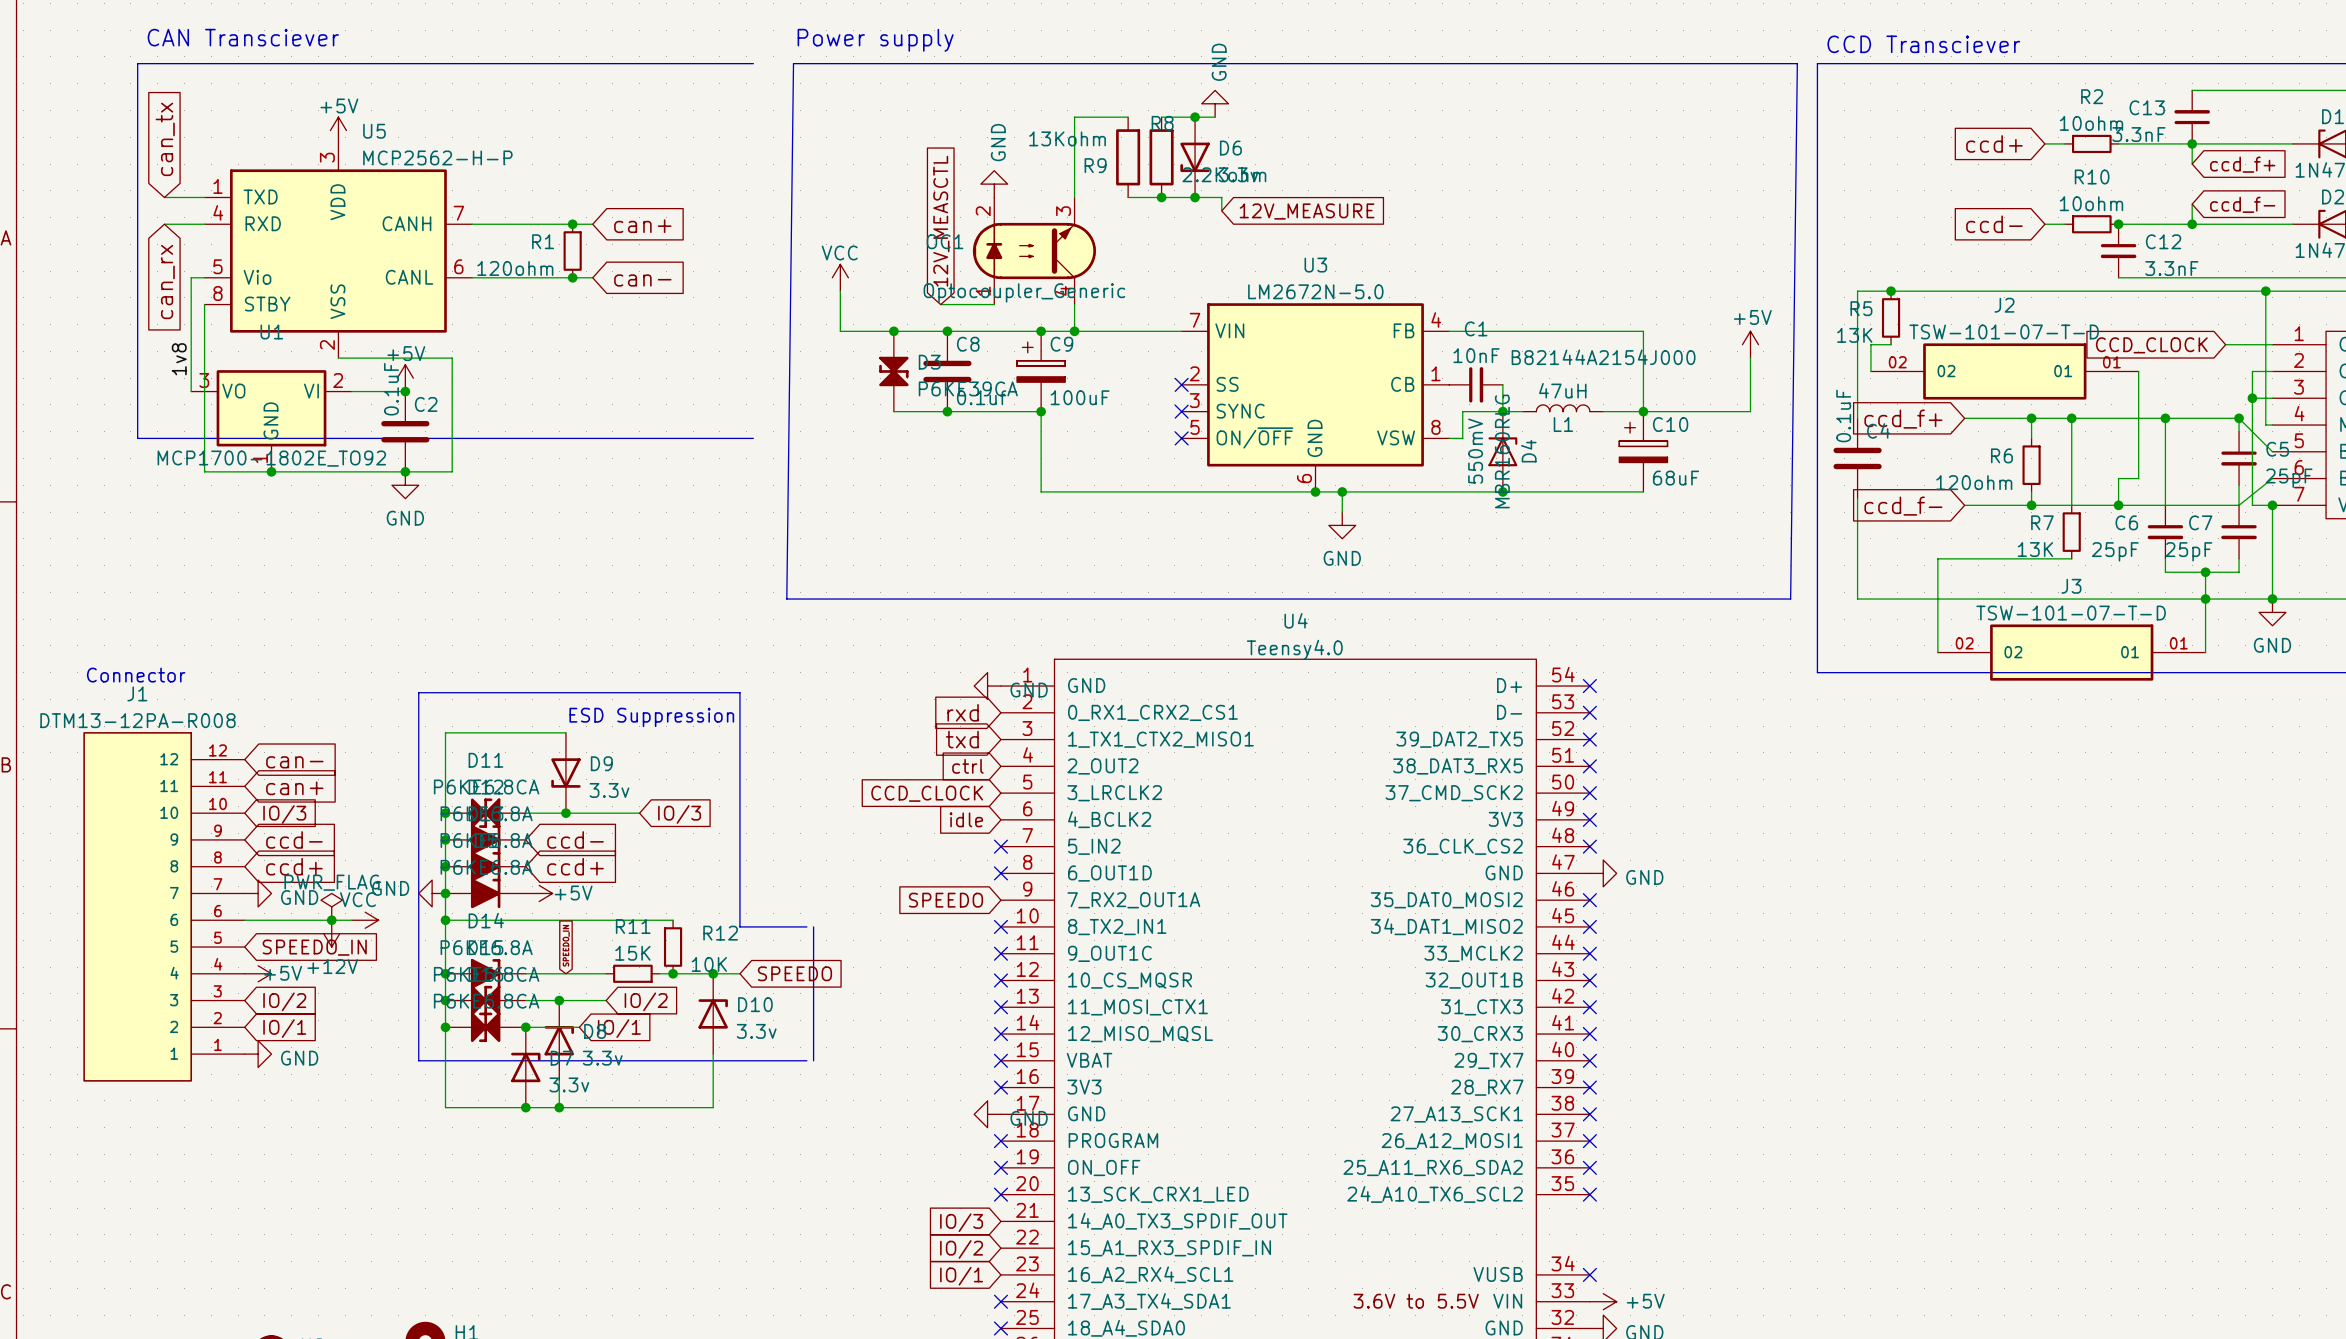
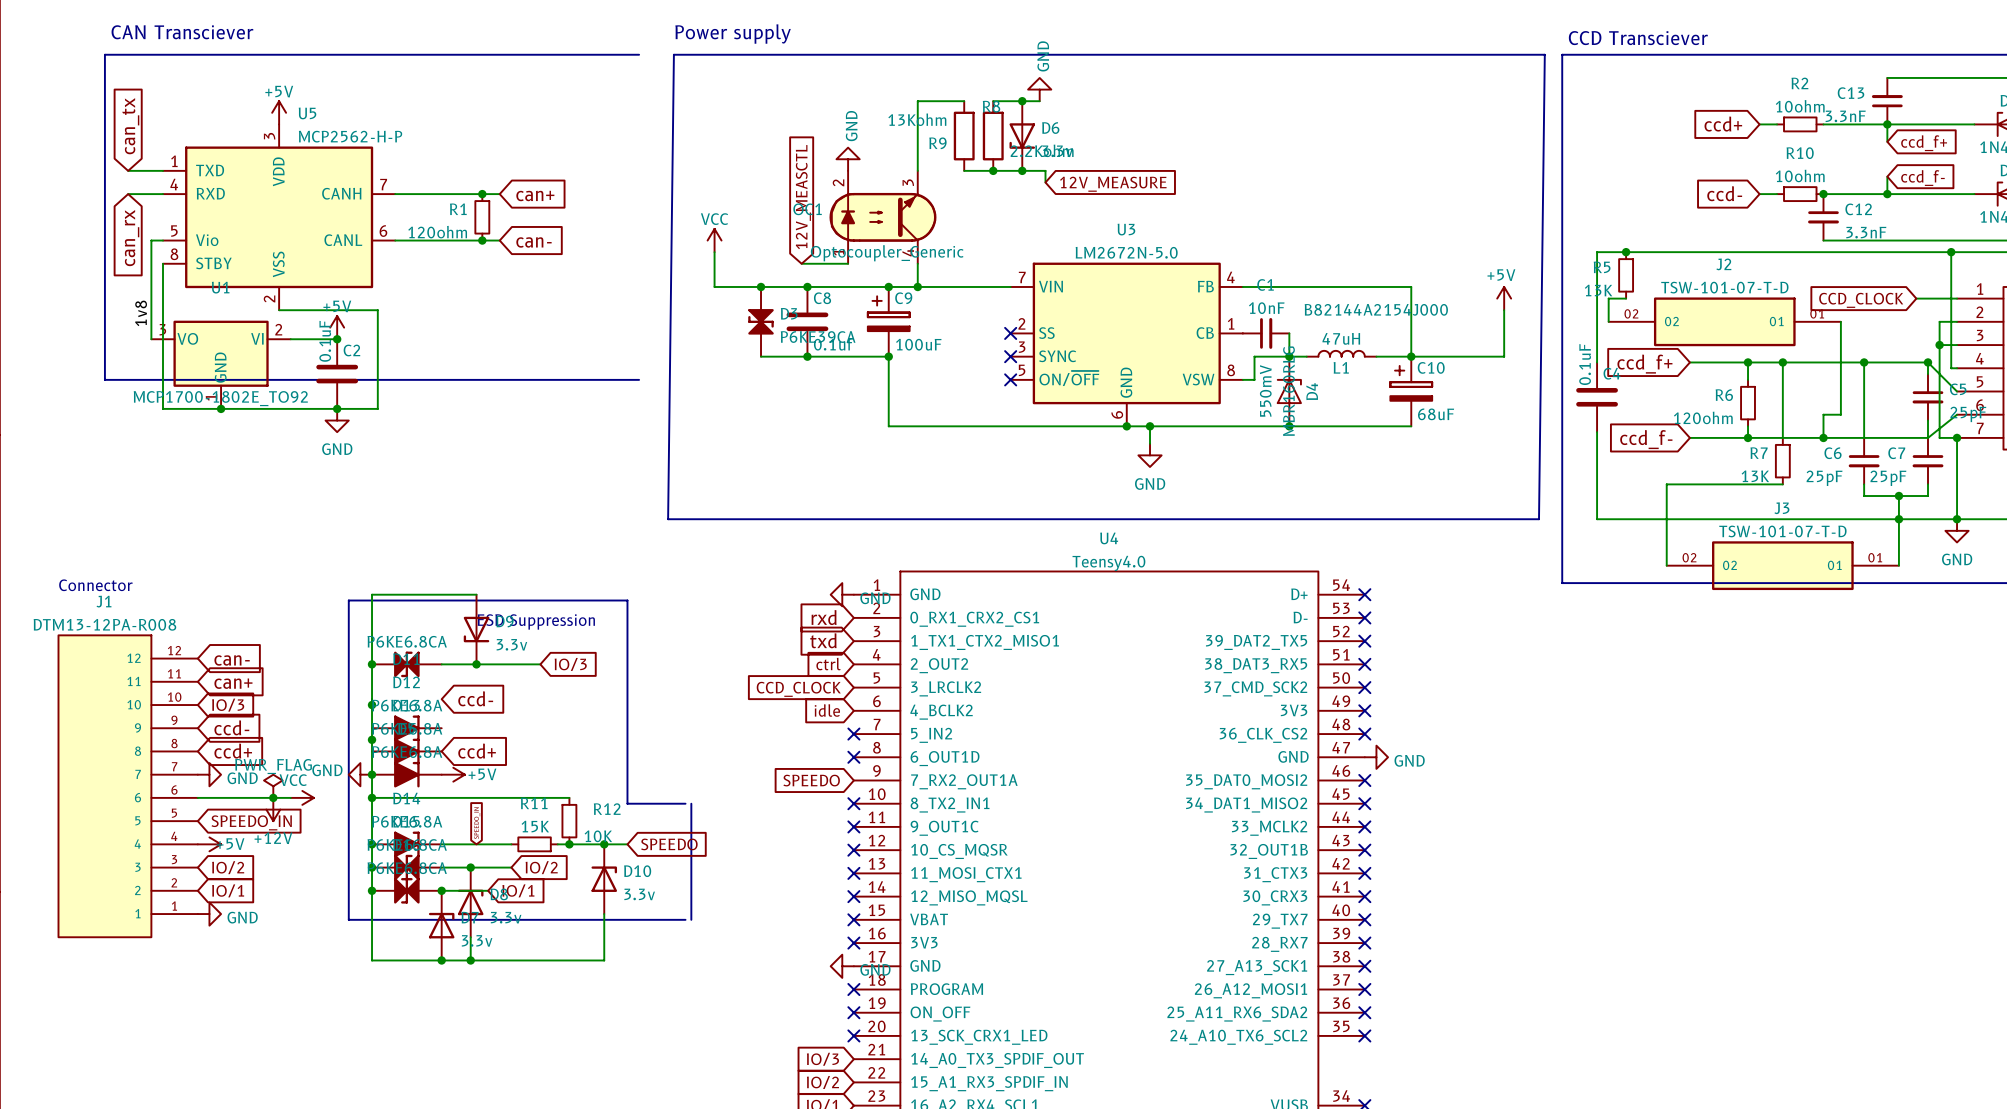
wire: (445, 732) (565, 732) -> (372, 635) (372, 594) (476, 594)
junction: none -> (372, 664)
D9 position: (565, 773) -> (476, 629)
D11 position: (485, 813) -> (406, 664)
wire: (525, 813) (639, 813) -> (441, 664) (540, 664)
junction position: (565, 813) -> (476, 664)
global label position: IO/3 (679, 814) -> IO/3 (570, 664)
junction: (445, 839) -> none
global label position: ccd- (575, 839) -> ccd- (475, 698)
junction: none -> (372, 739)
junction: (445, 866) -> none

